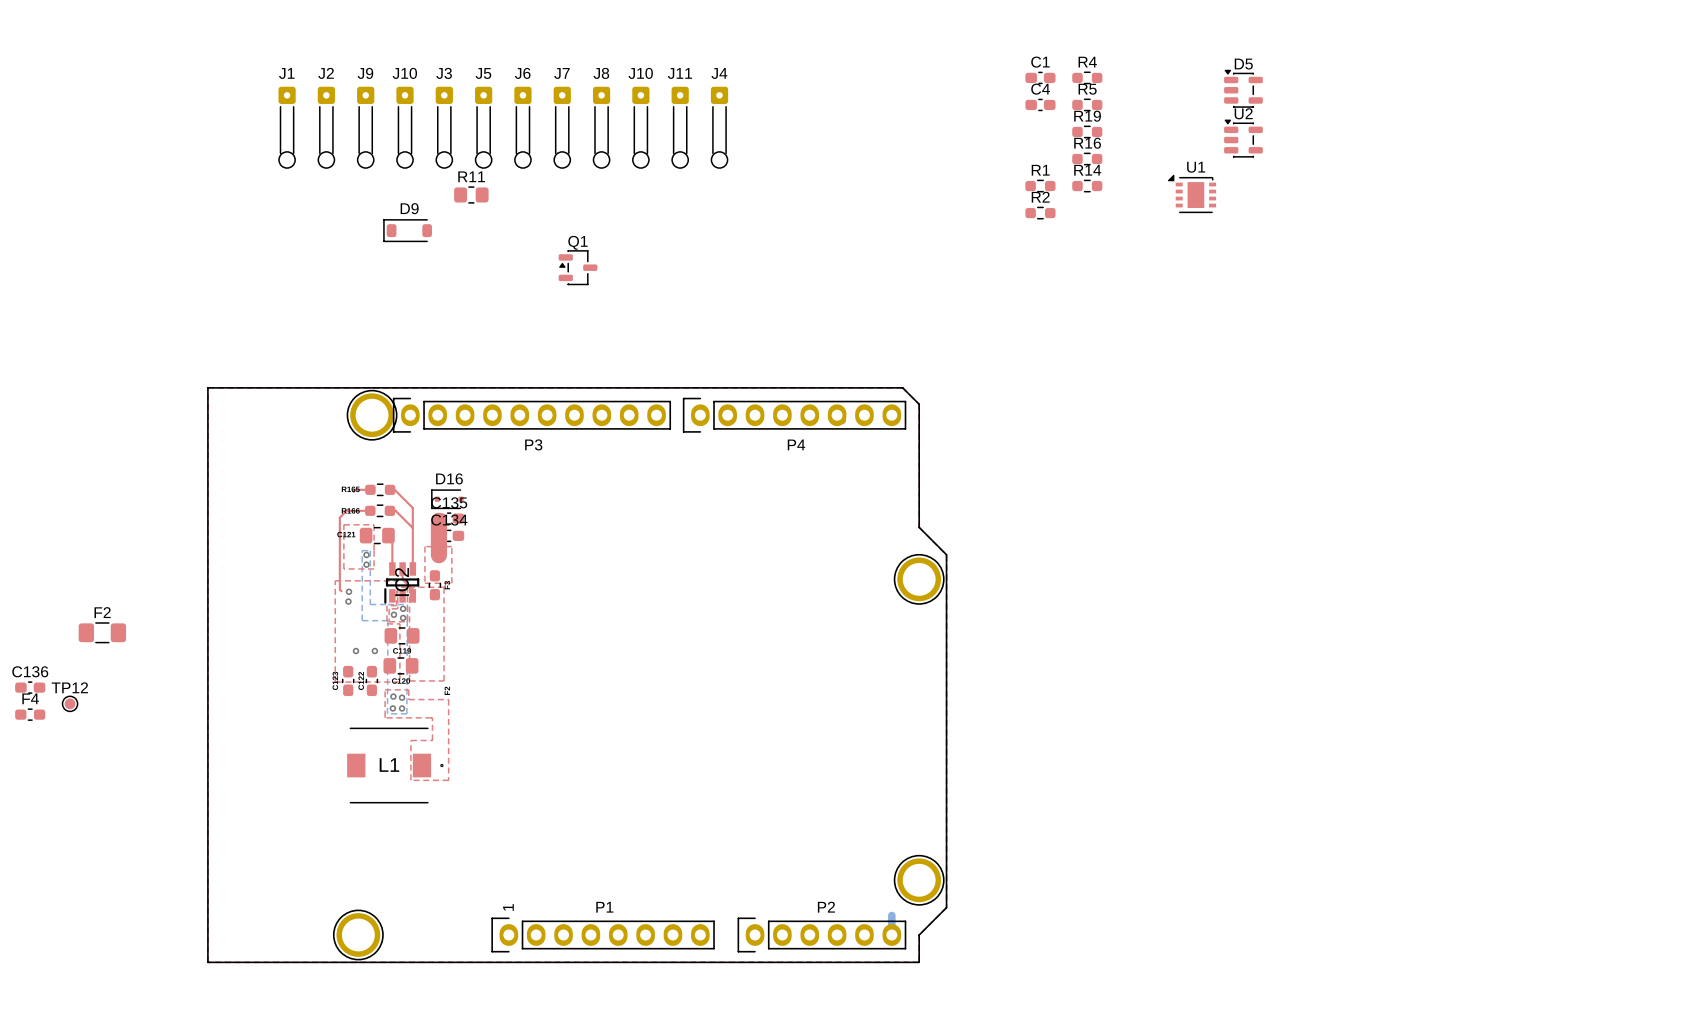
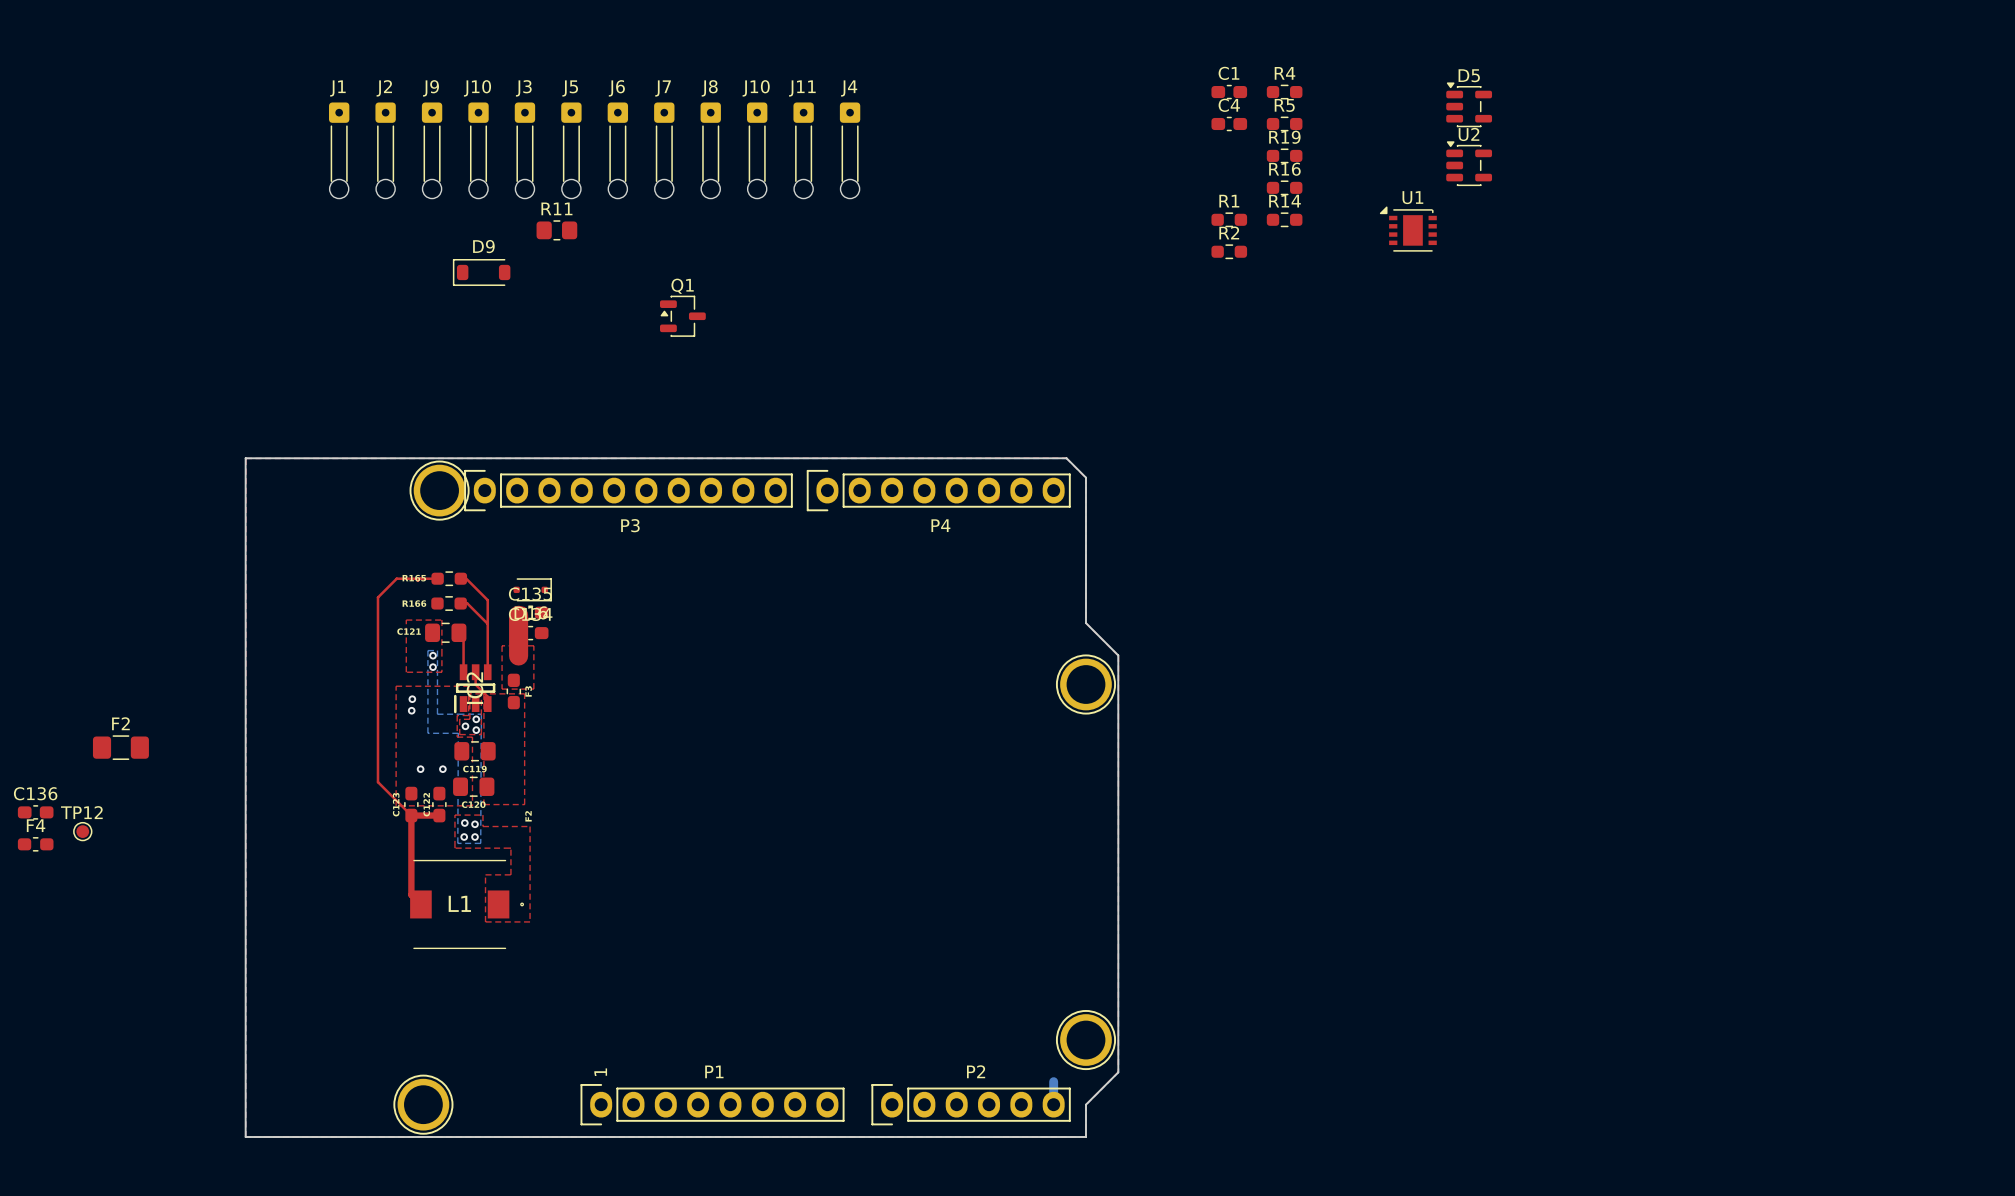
top track: none -> (419, 578) (396, 578) (377, 597) (377, 782) (411, 815)
D16 rotation: 0° (447, 499) -> 180° (532, 589)
top track: (370, 510) (346, 510) (339, 517) (339, 589) (341, 591) -> none
top track: none -> (411, 815) (439, 815)
top track: none -> (411, 815) (411, 894) (420, 904)

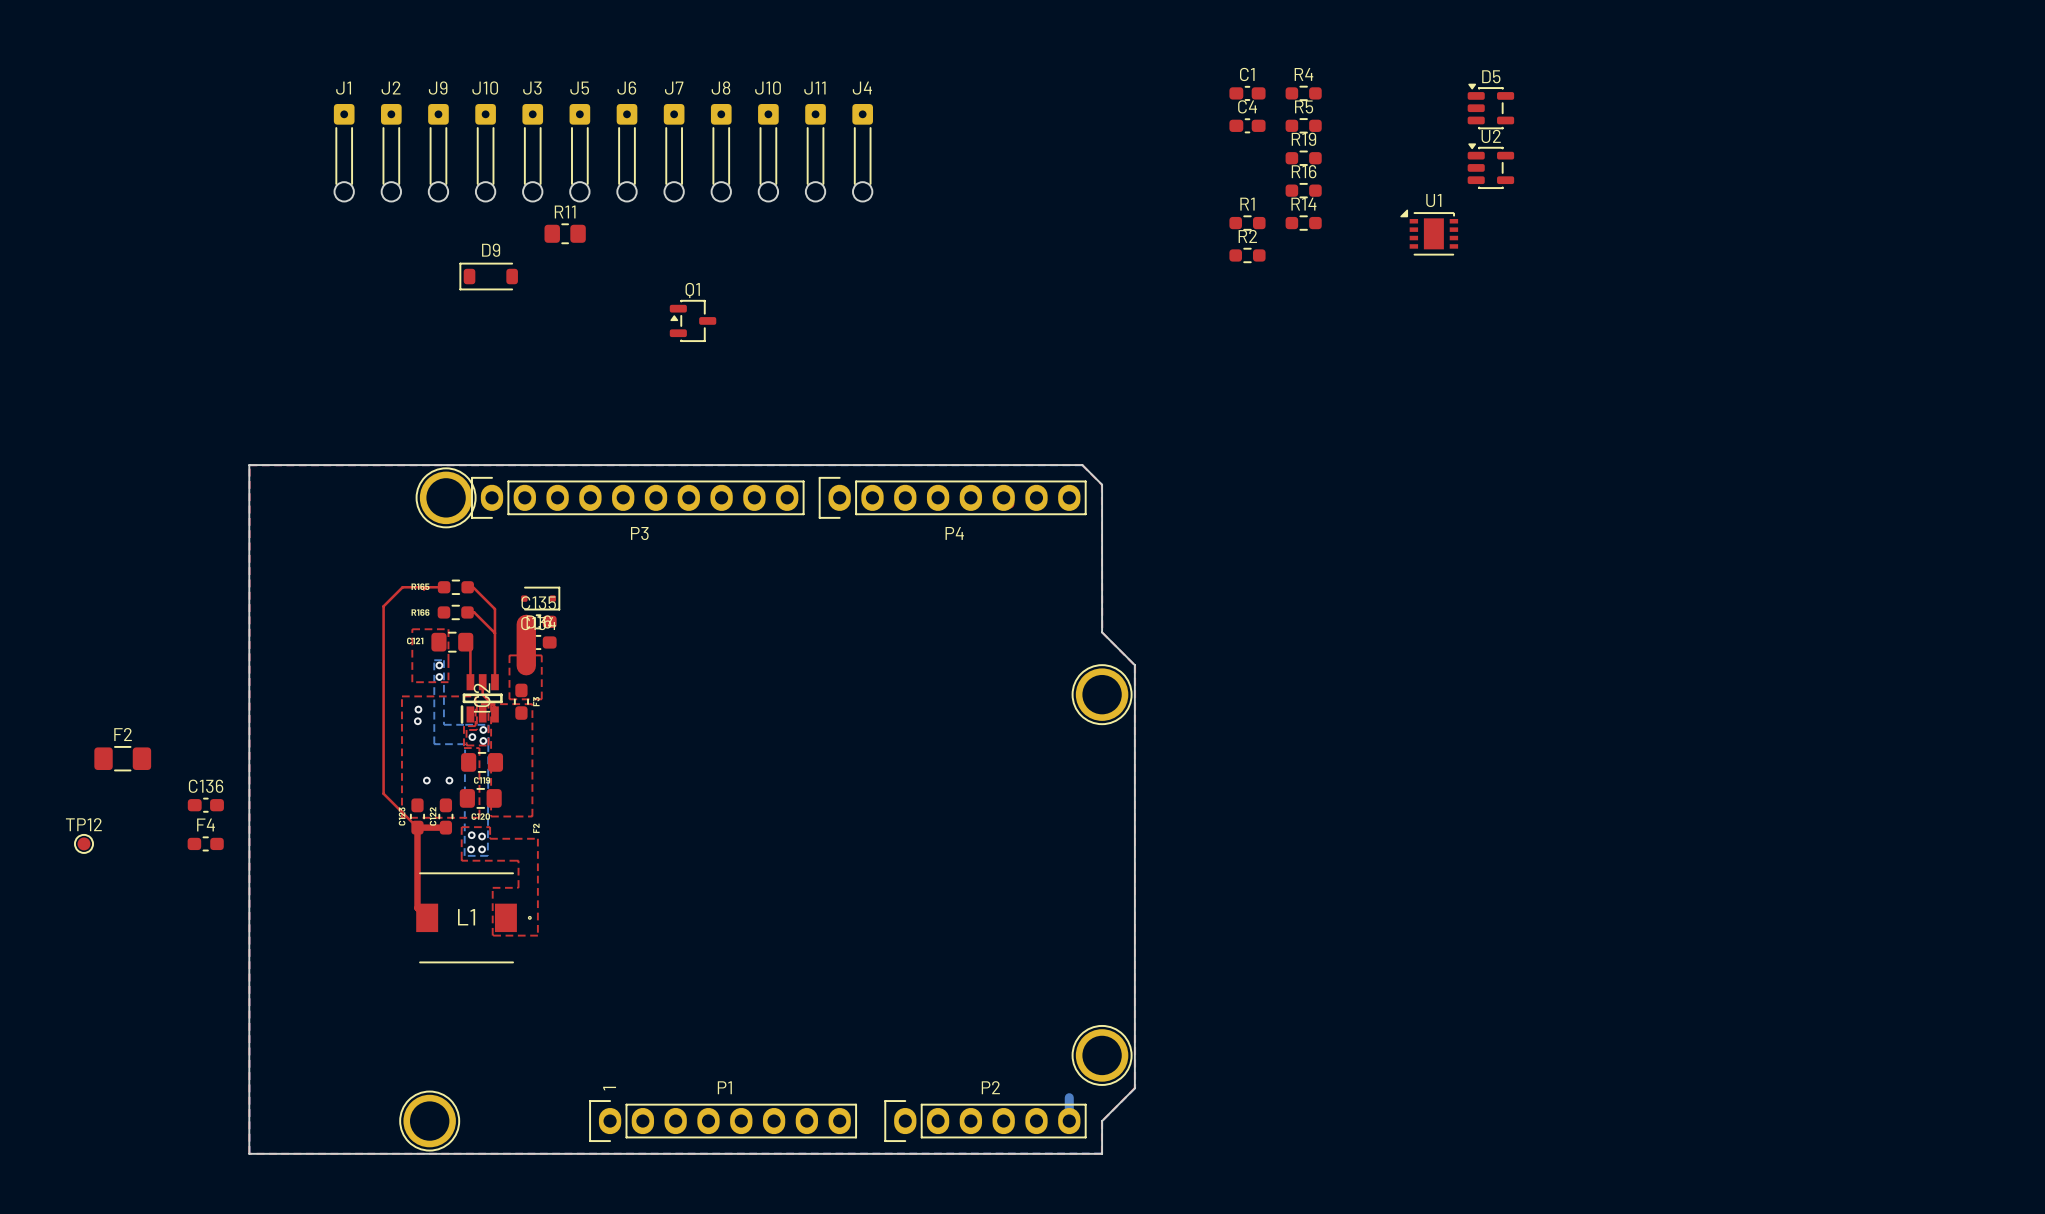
C136 position: (35, 812) -> (205, 805)
F4 position: (35, 844) -> (205, 843)

